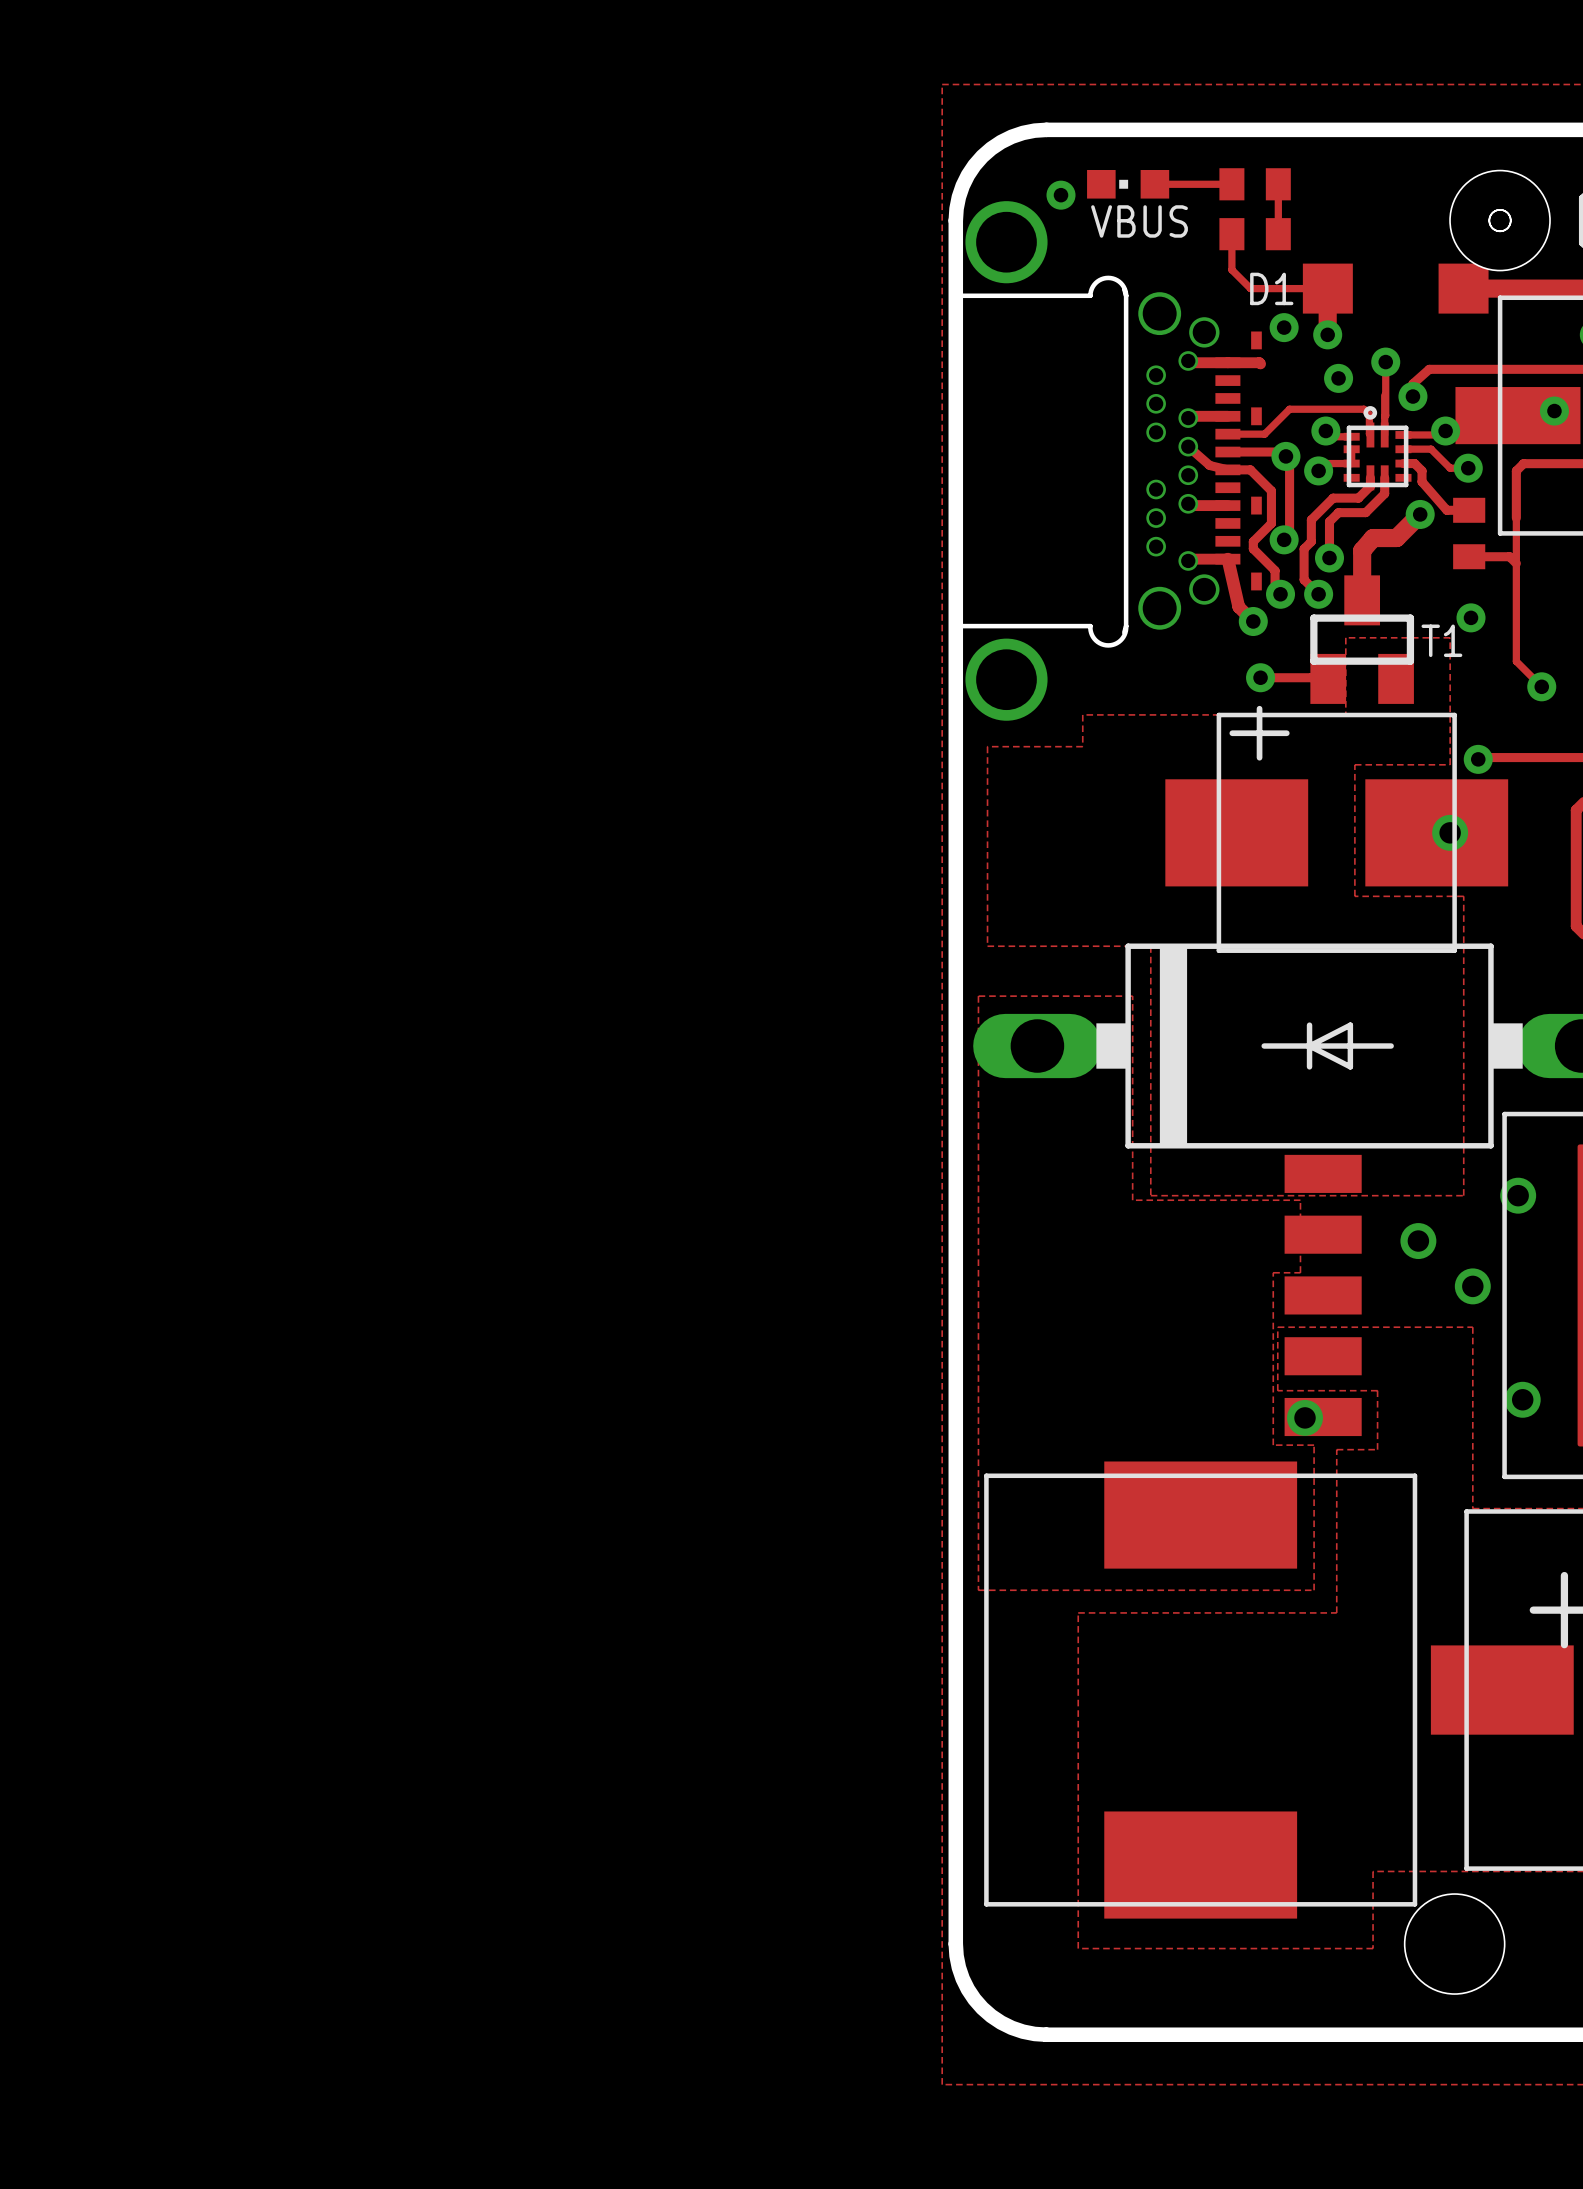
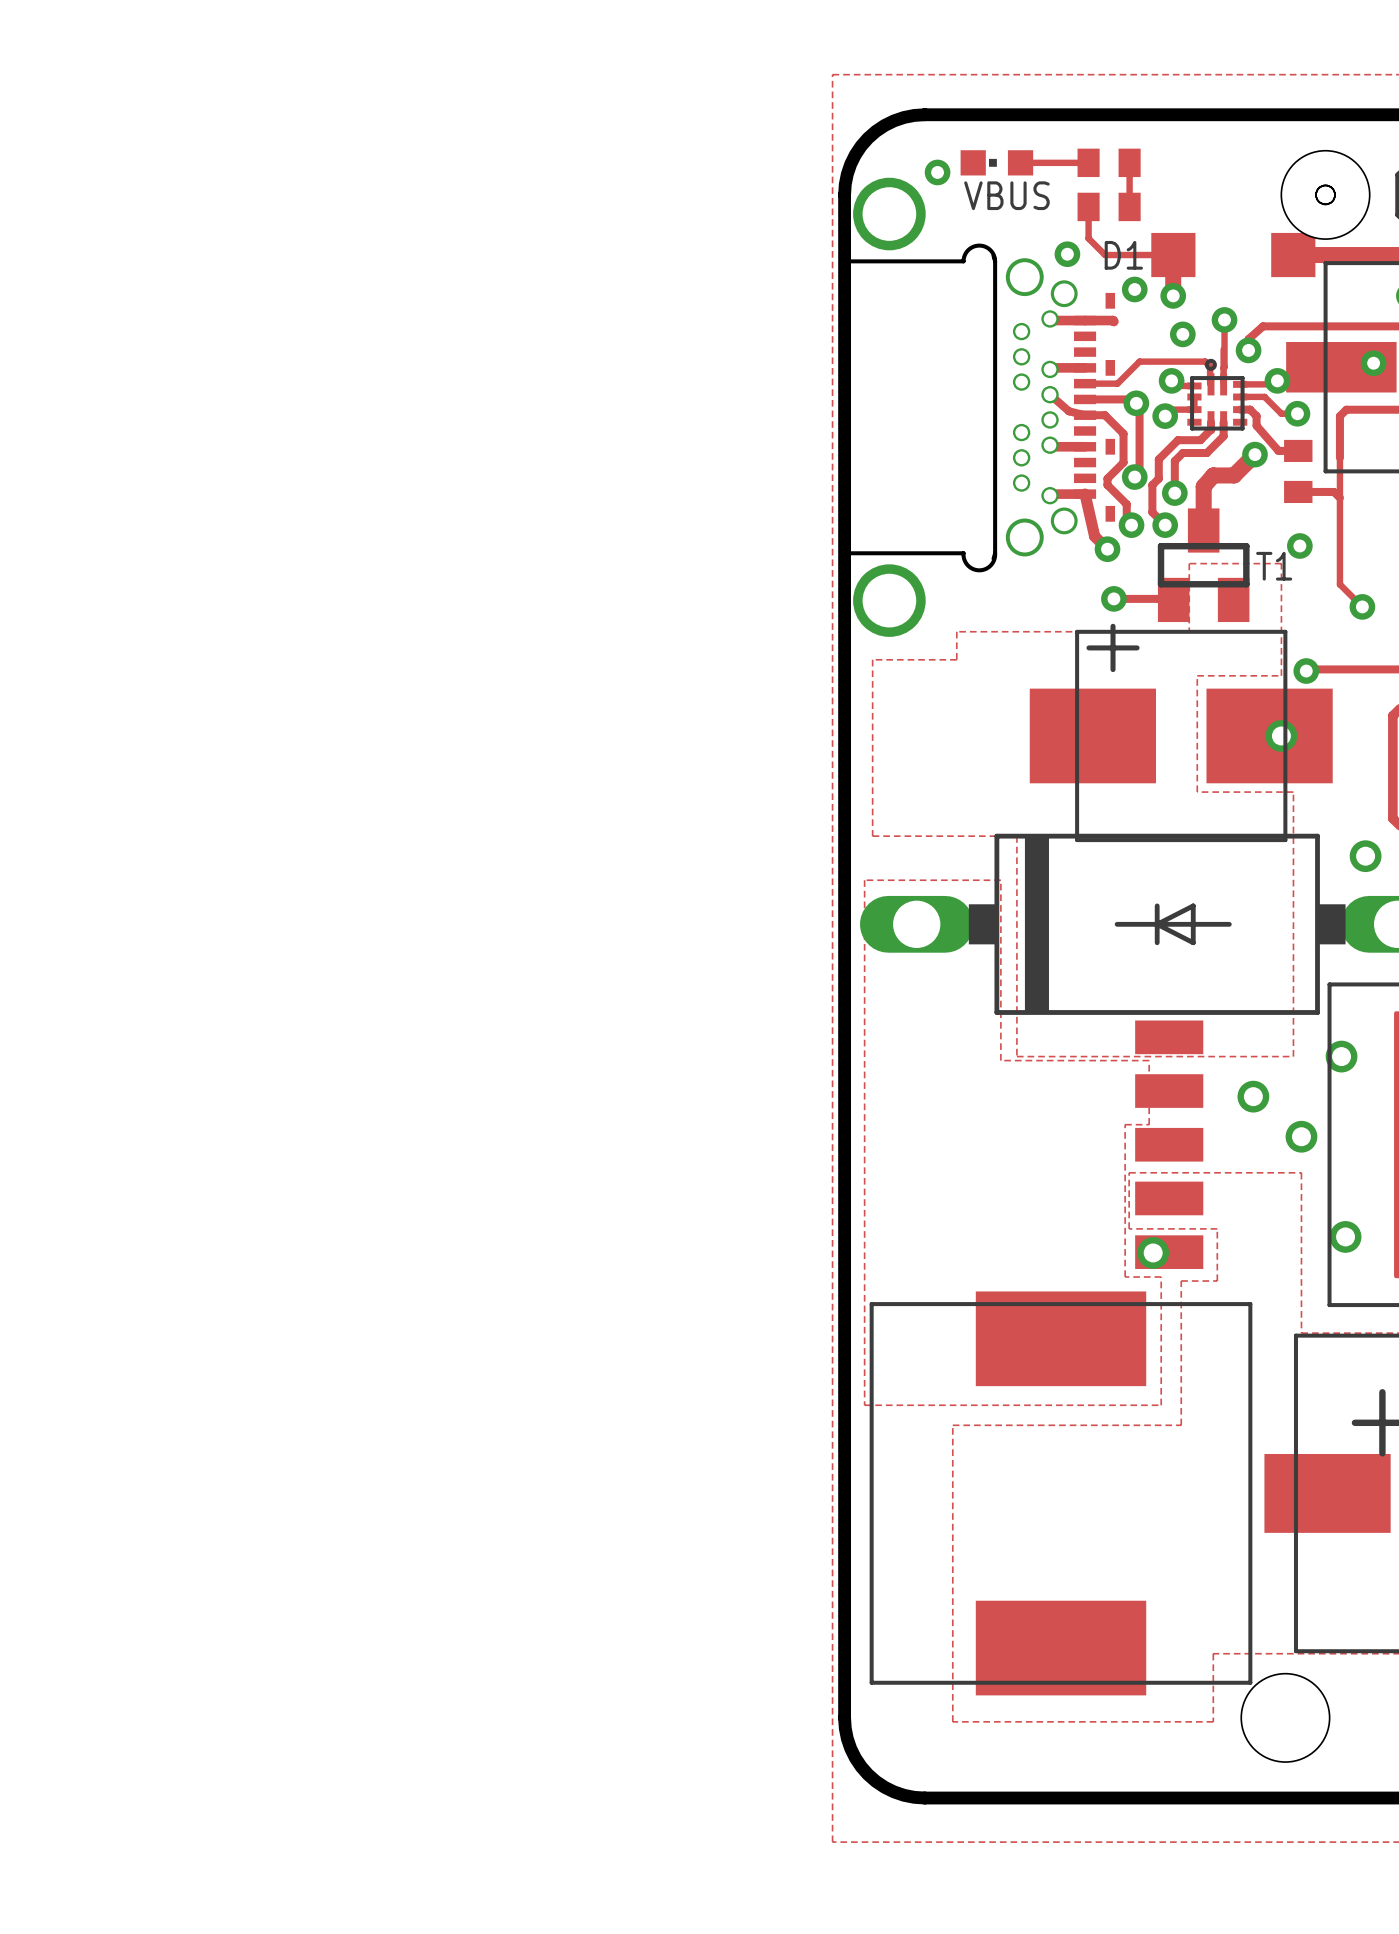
via: none -> (1067, 254)
via: none -> (1365, 856)

